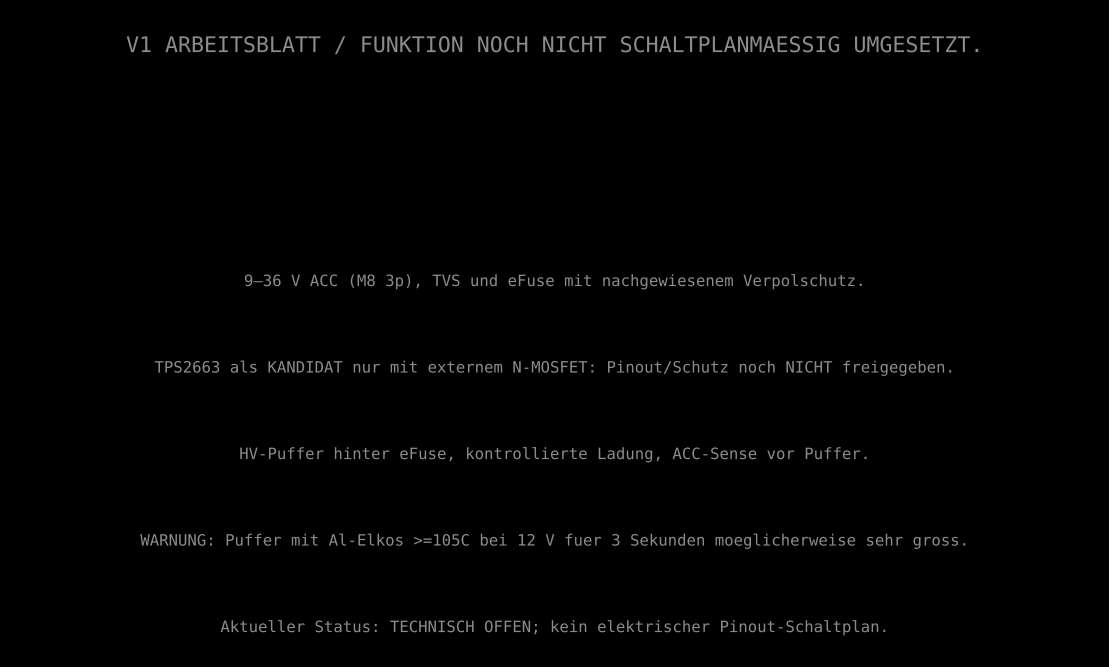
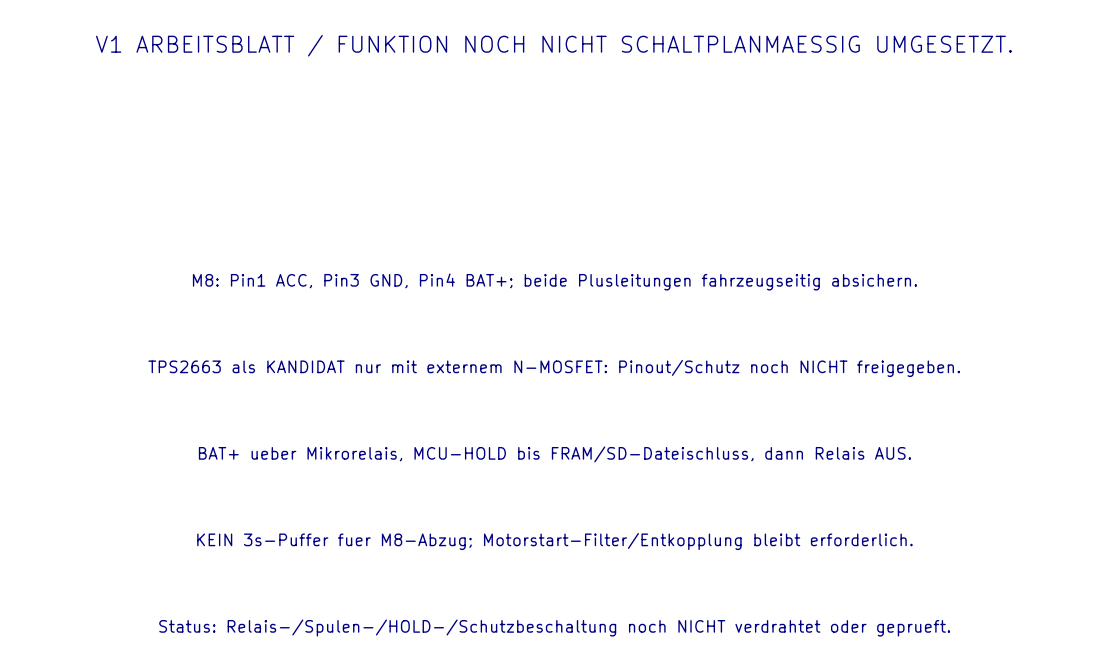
text: 9–36 V ACC (M8 3p), TVS und eFuse mit nachgewiesenem Verpolschutz. (553, 281) -> M8: Pin1 ACC, Pin3 GND, Pin4 BAT+; beide Plusleitungen fahrzeugseitig absichern. (554, 281)
text: HV-Puffer hinter eFuse, kontrollierte Ladung, ACC-Sense vor Puffer. (553, 454) -> BAT+ ueber Mikrorelais, MCU-HOLD bis FRAM/SD-Dateischluss, dann Relais AUS. (554, 454)
text: WARNUNG: Puffer mit Al-Elkos >=105C bei 12 V fuer 3 Sekunden moeglicherweise sehr gross. (552, 541) -> KEIN 3s-Puffer fuer M8-Abzug; Motorstart-Filter/Entkopplung bleibt erforderlich. (554, 541)
text: Aktueller Status: TECHNISCH OFFEN; kein elektrischer Pinout-Schaltplan. (552, 627) -> Status: Relais-/Spulen-/HOLD-/Schutzbeschaltung noch NICHT verdrahtet oder geprueft. (554, 628)

